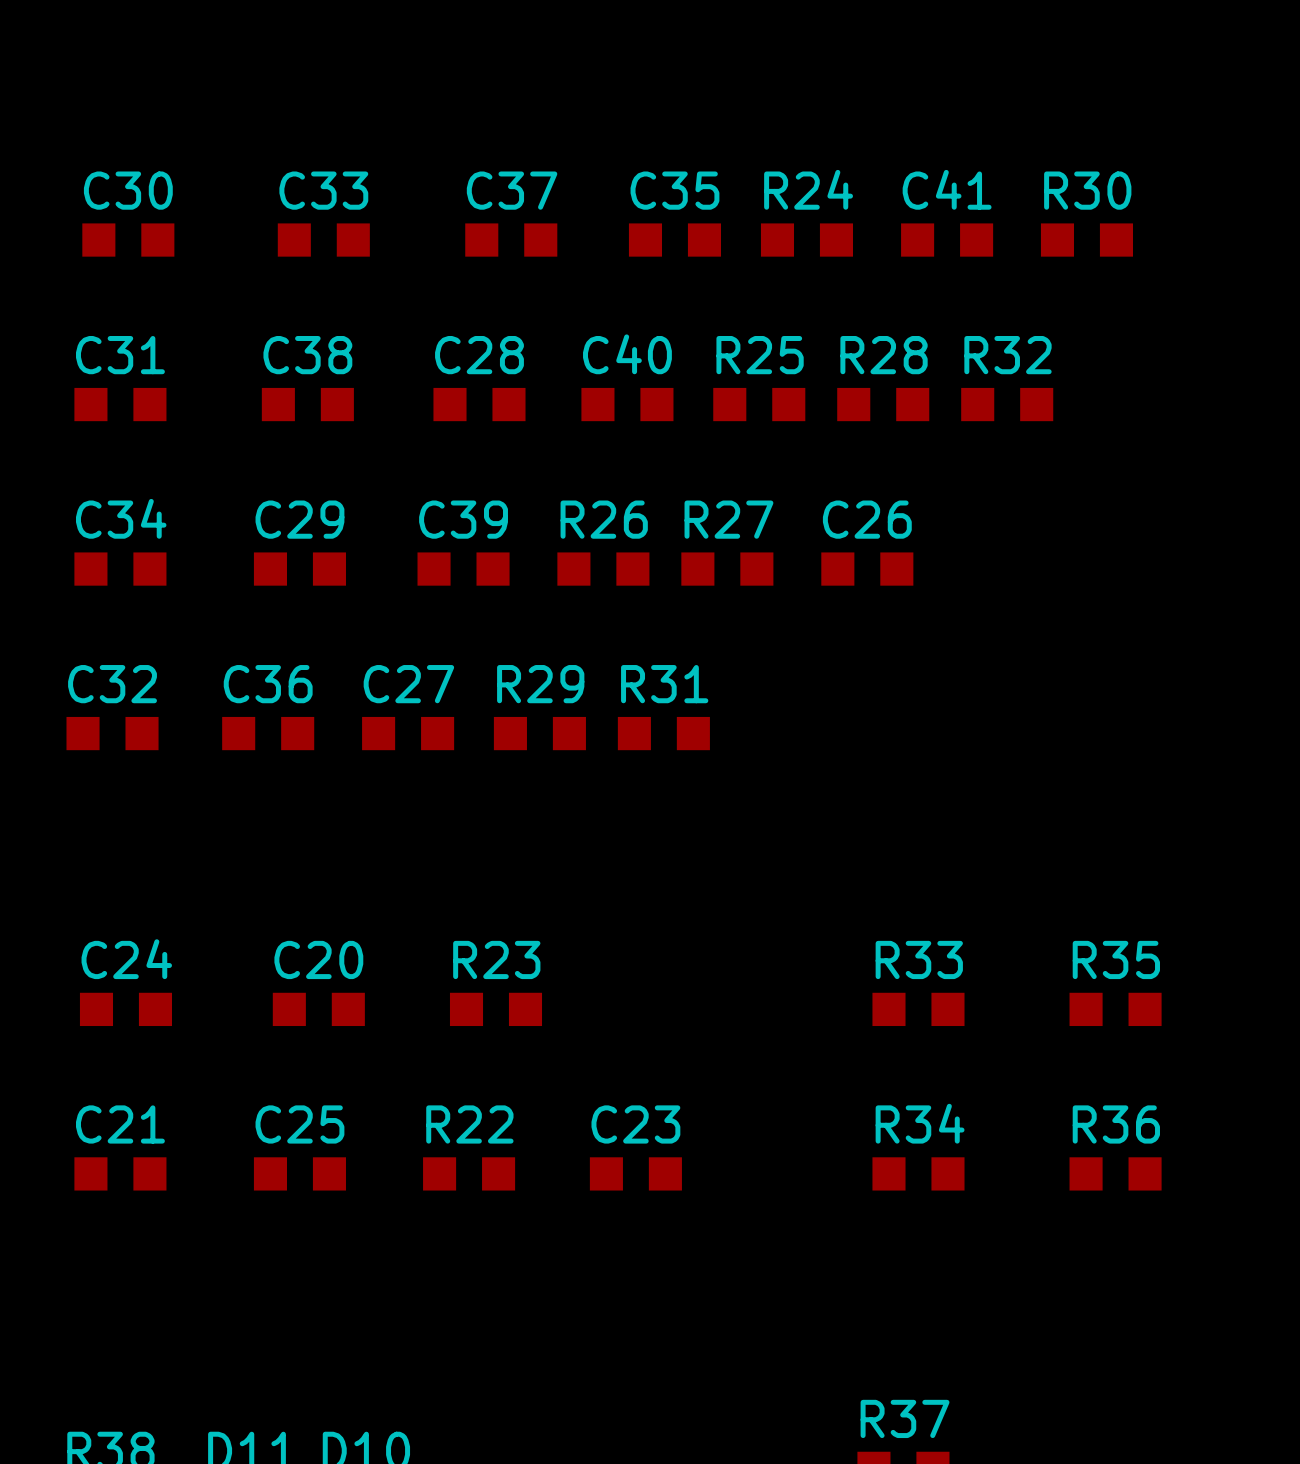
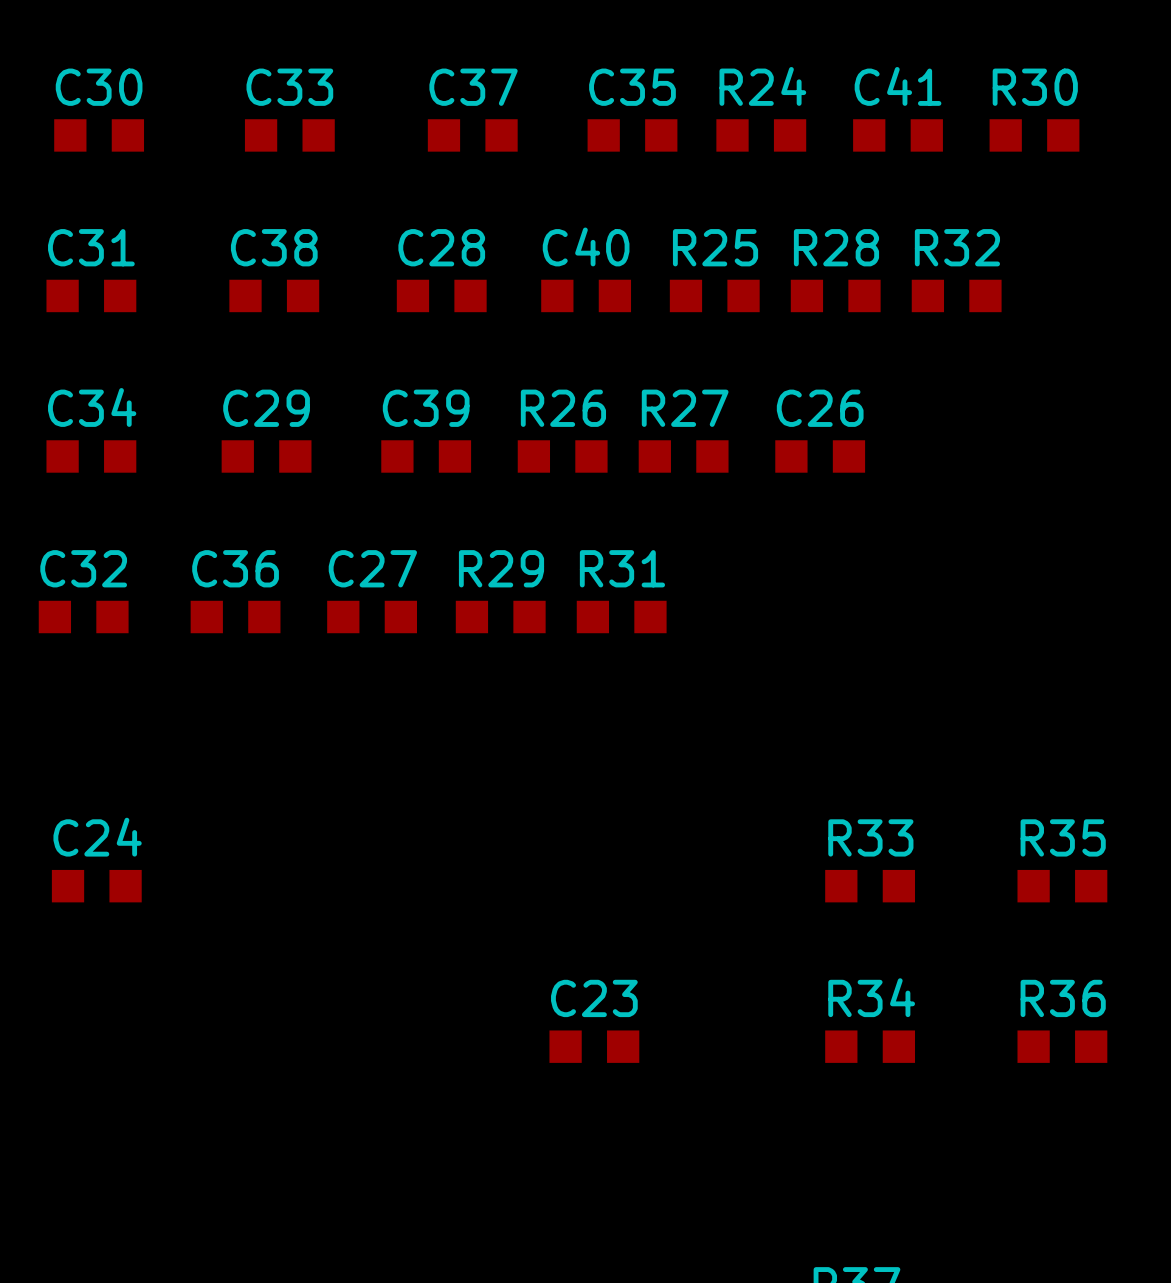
C20: (318, 1009) -> none
R23: (495, 1009) -> none
C21: (120, 1173) -> none
C25: (299, 1173) -> none
R22: (469, 1173) -> none

